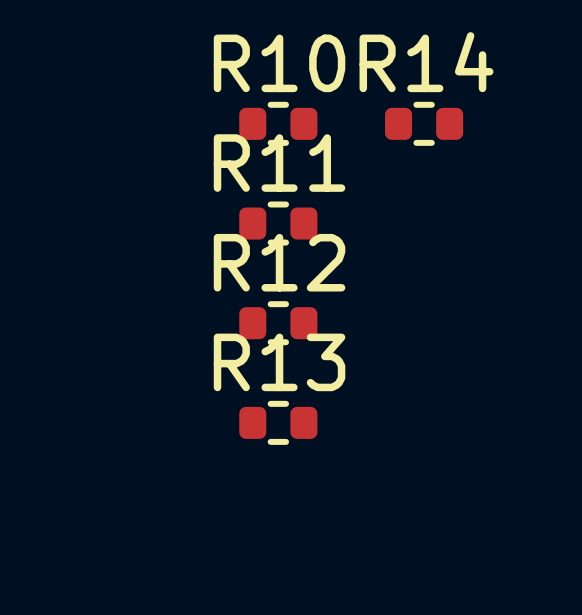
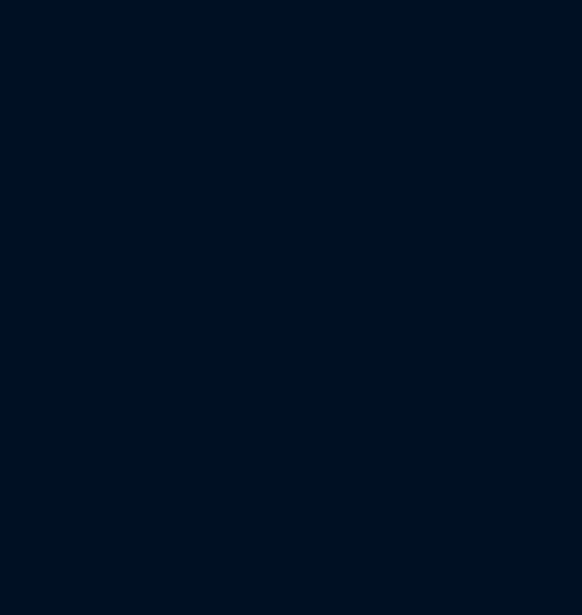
R10: (278, 123) -> none
R14: (424, 123) -> none
R11: (278, 223) -> none
R12: (278, 323) -> none
R13: (278, 422) -> none

